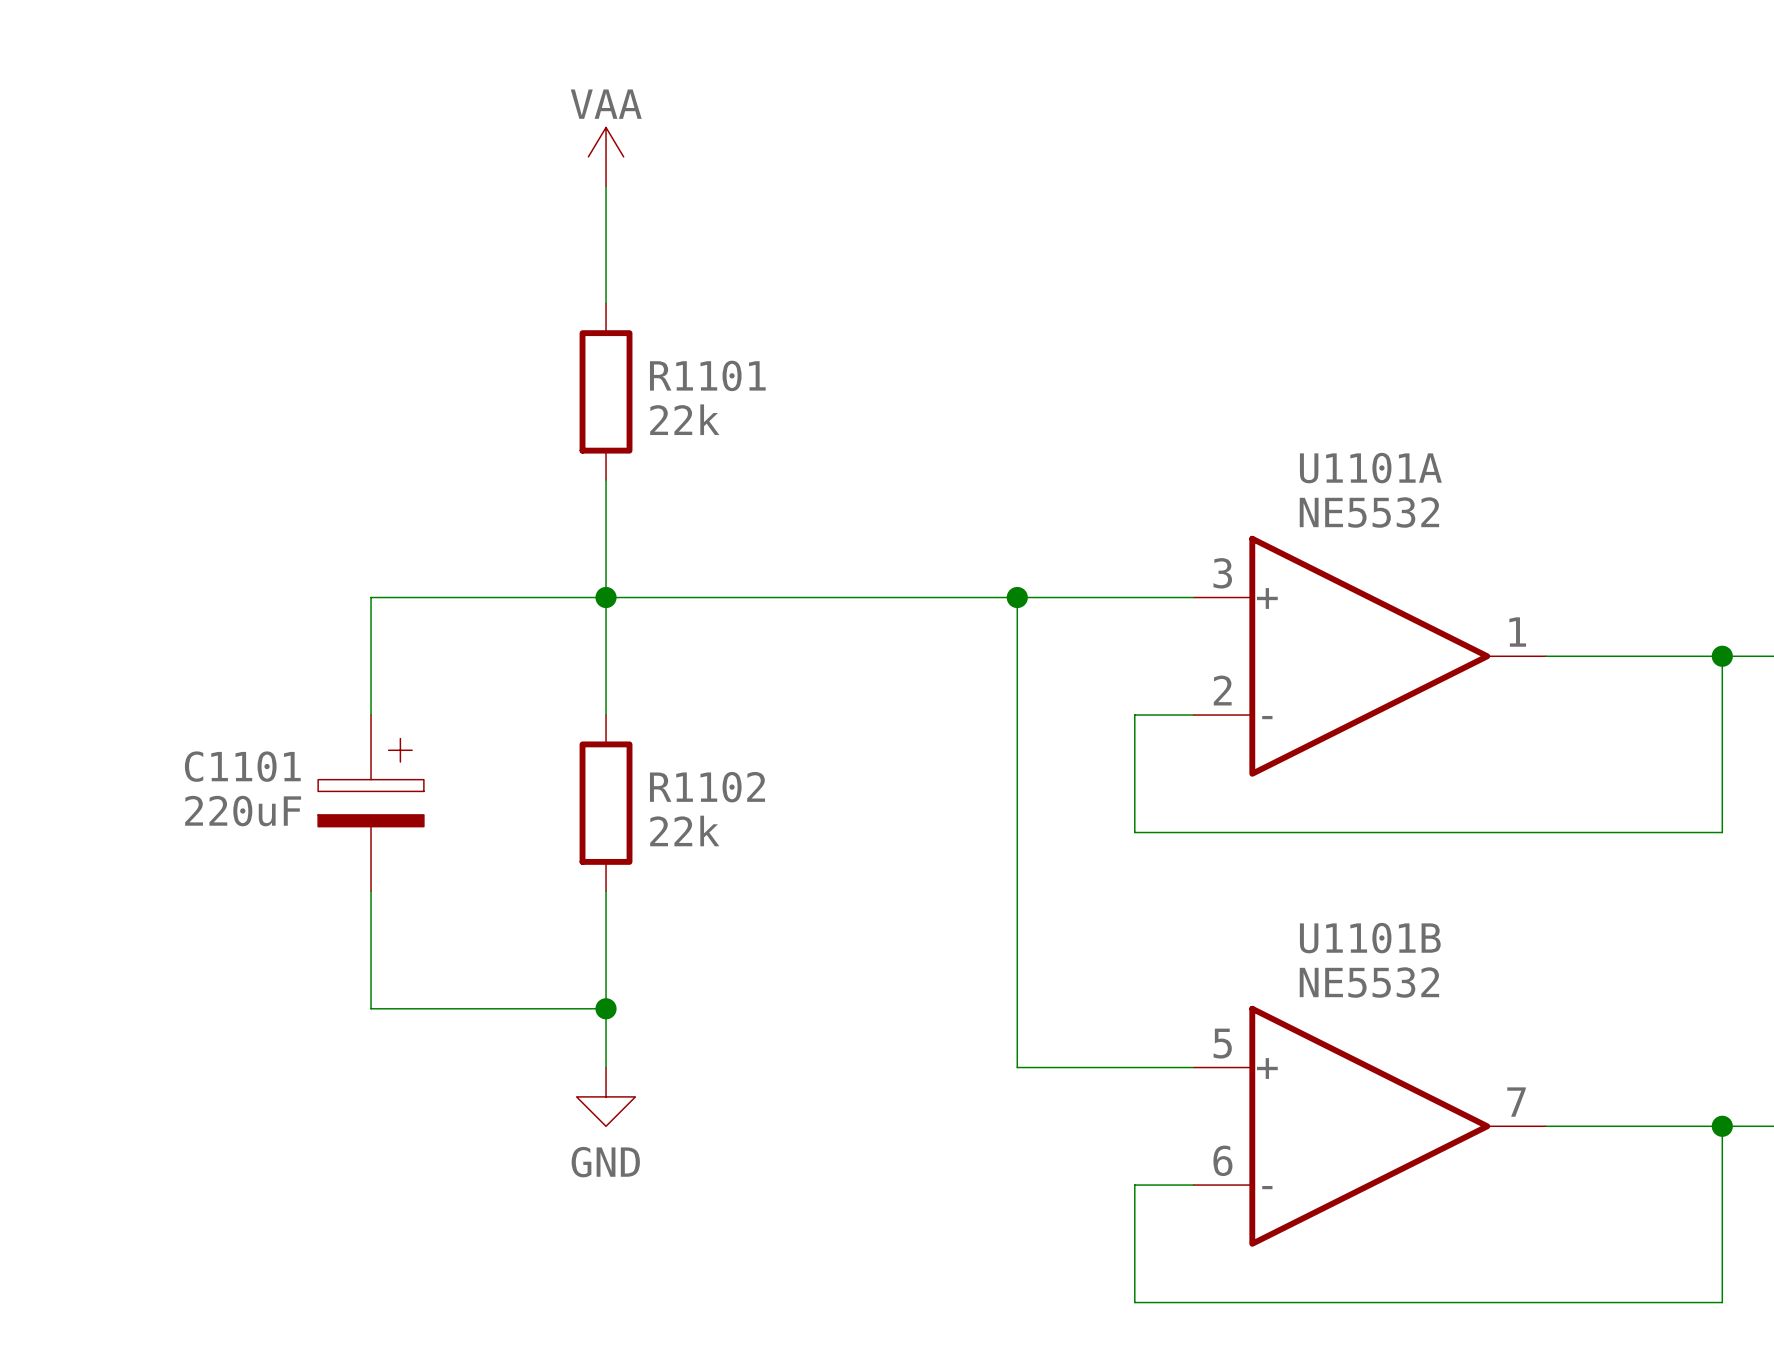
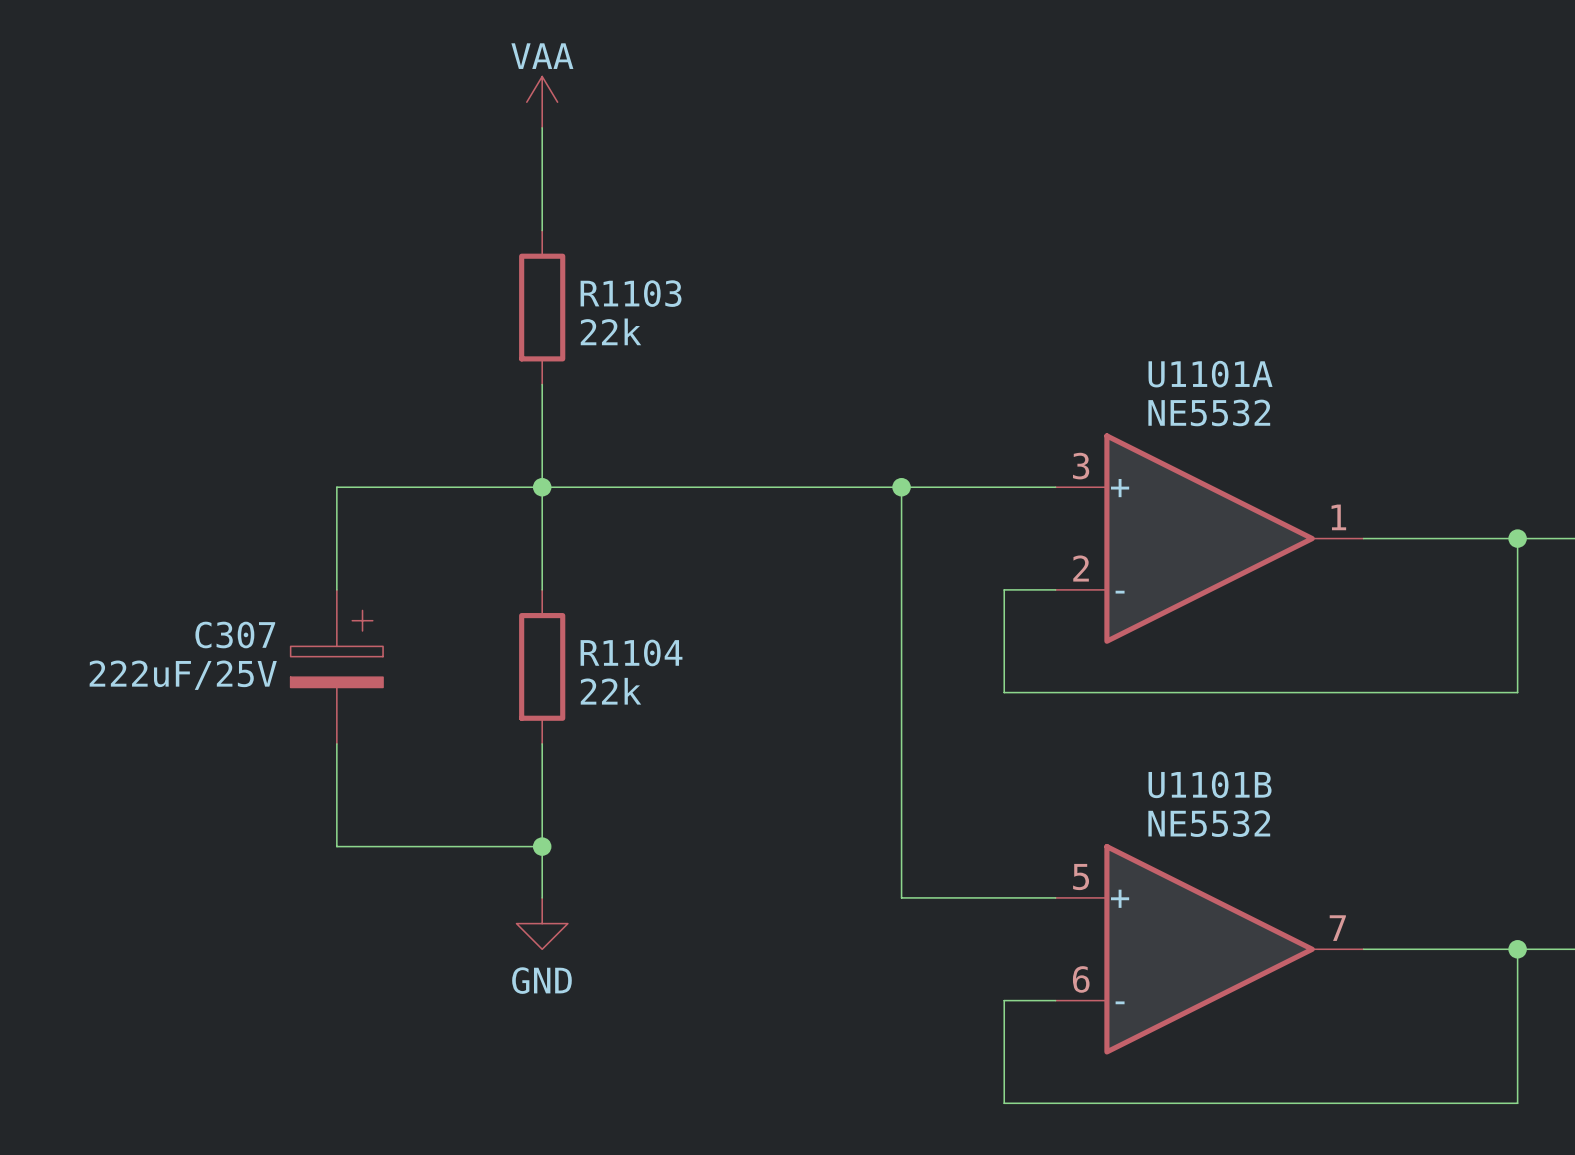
R1101 name: R1101 (707, 375) -> R1103 (631, 293)
C1101 name: C1101 (242, 766) -> C307 (235, 635)
R1102 name: R1102 (707, 787) -> R1104 (631, 652)
C1101 value: 220uF (243, 811) -> 222uF/25V (183, 675)

